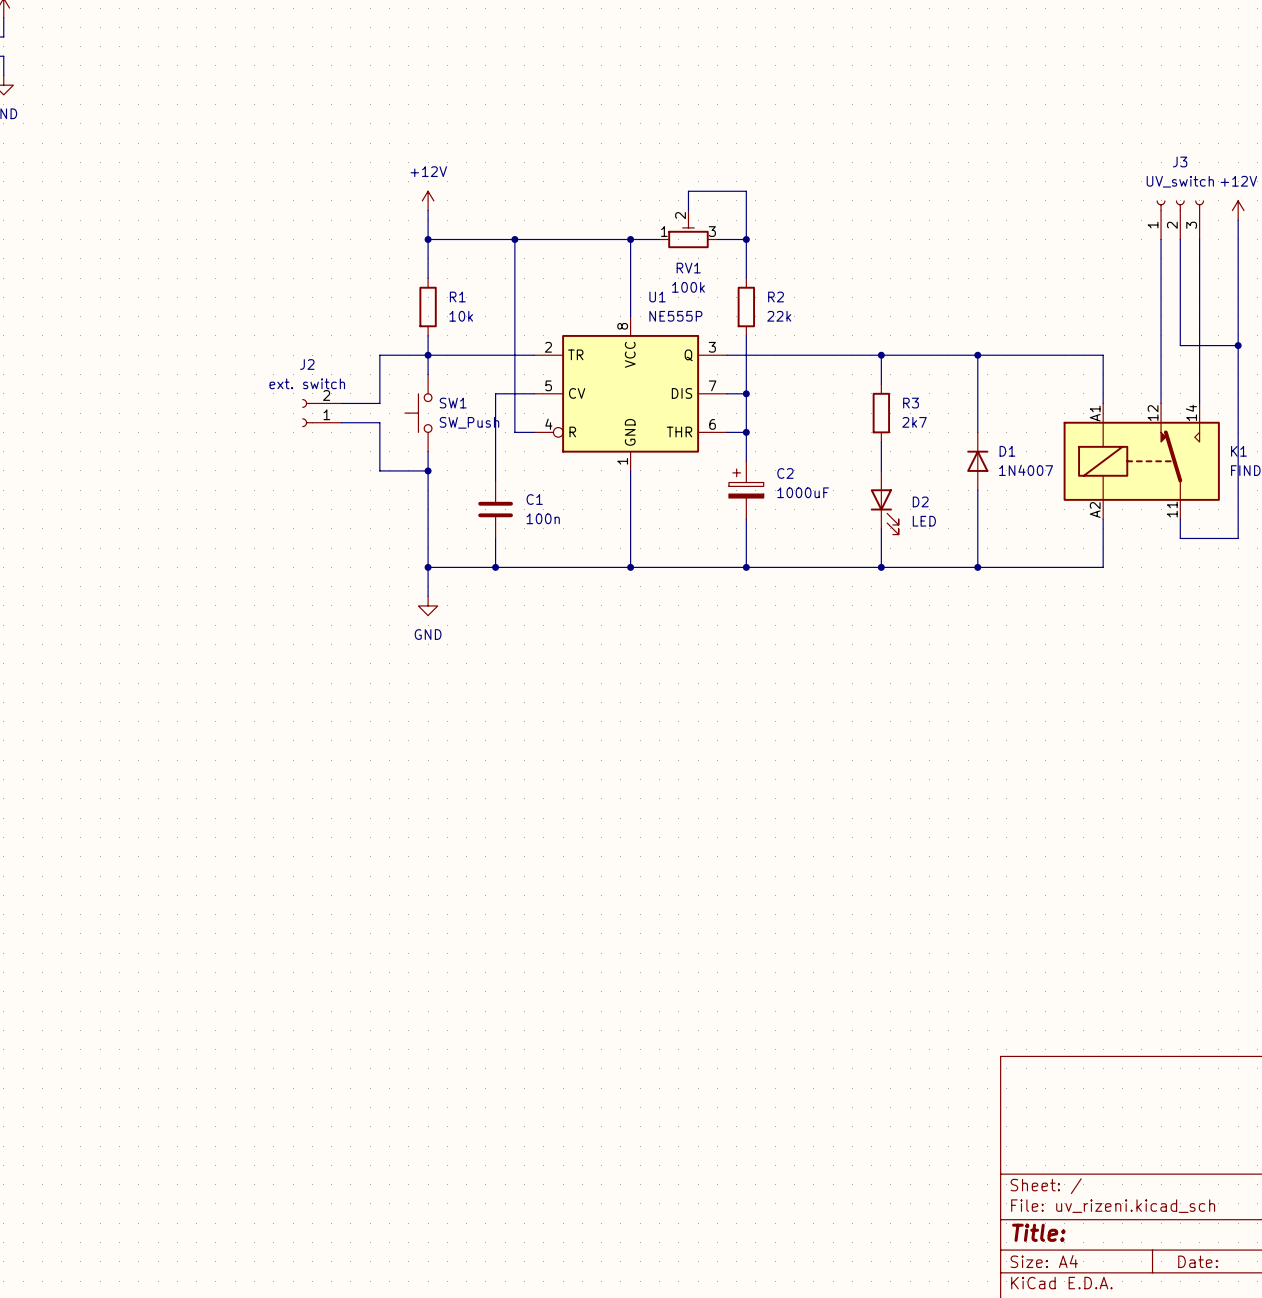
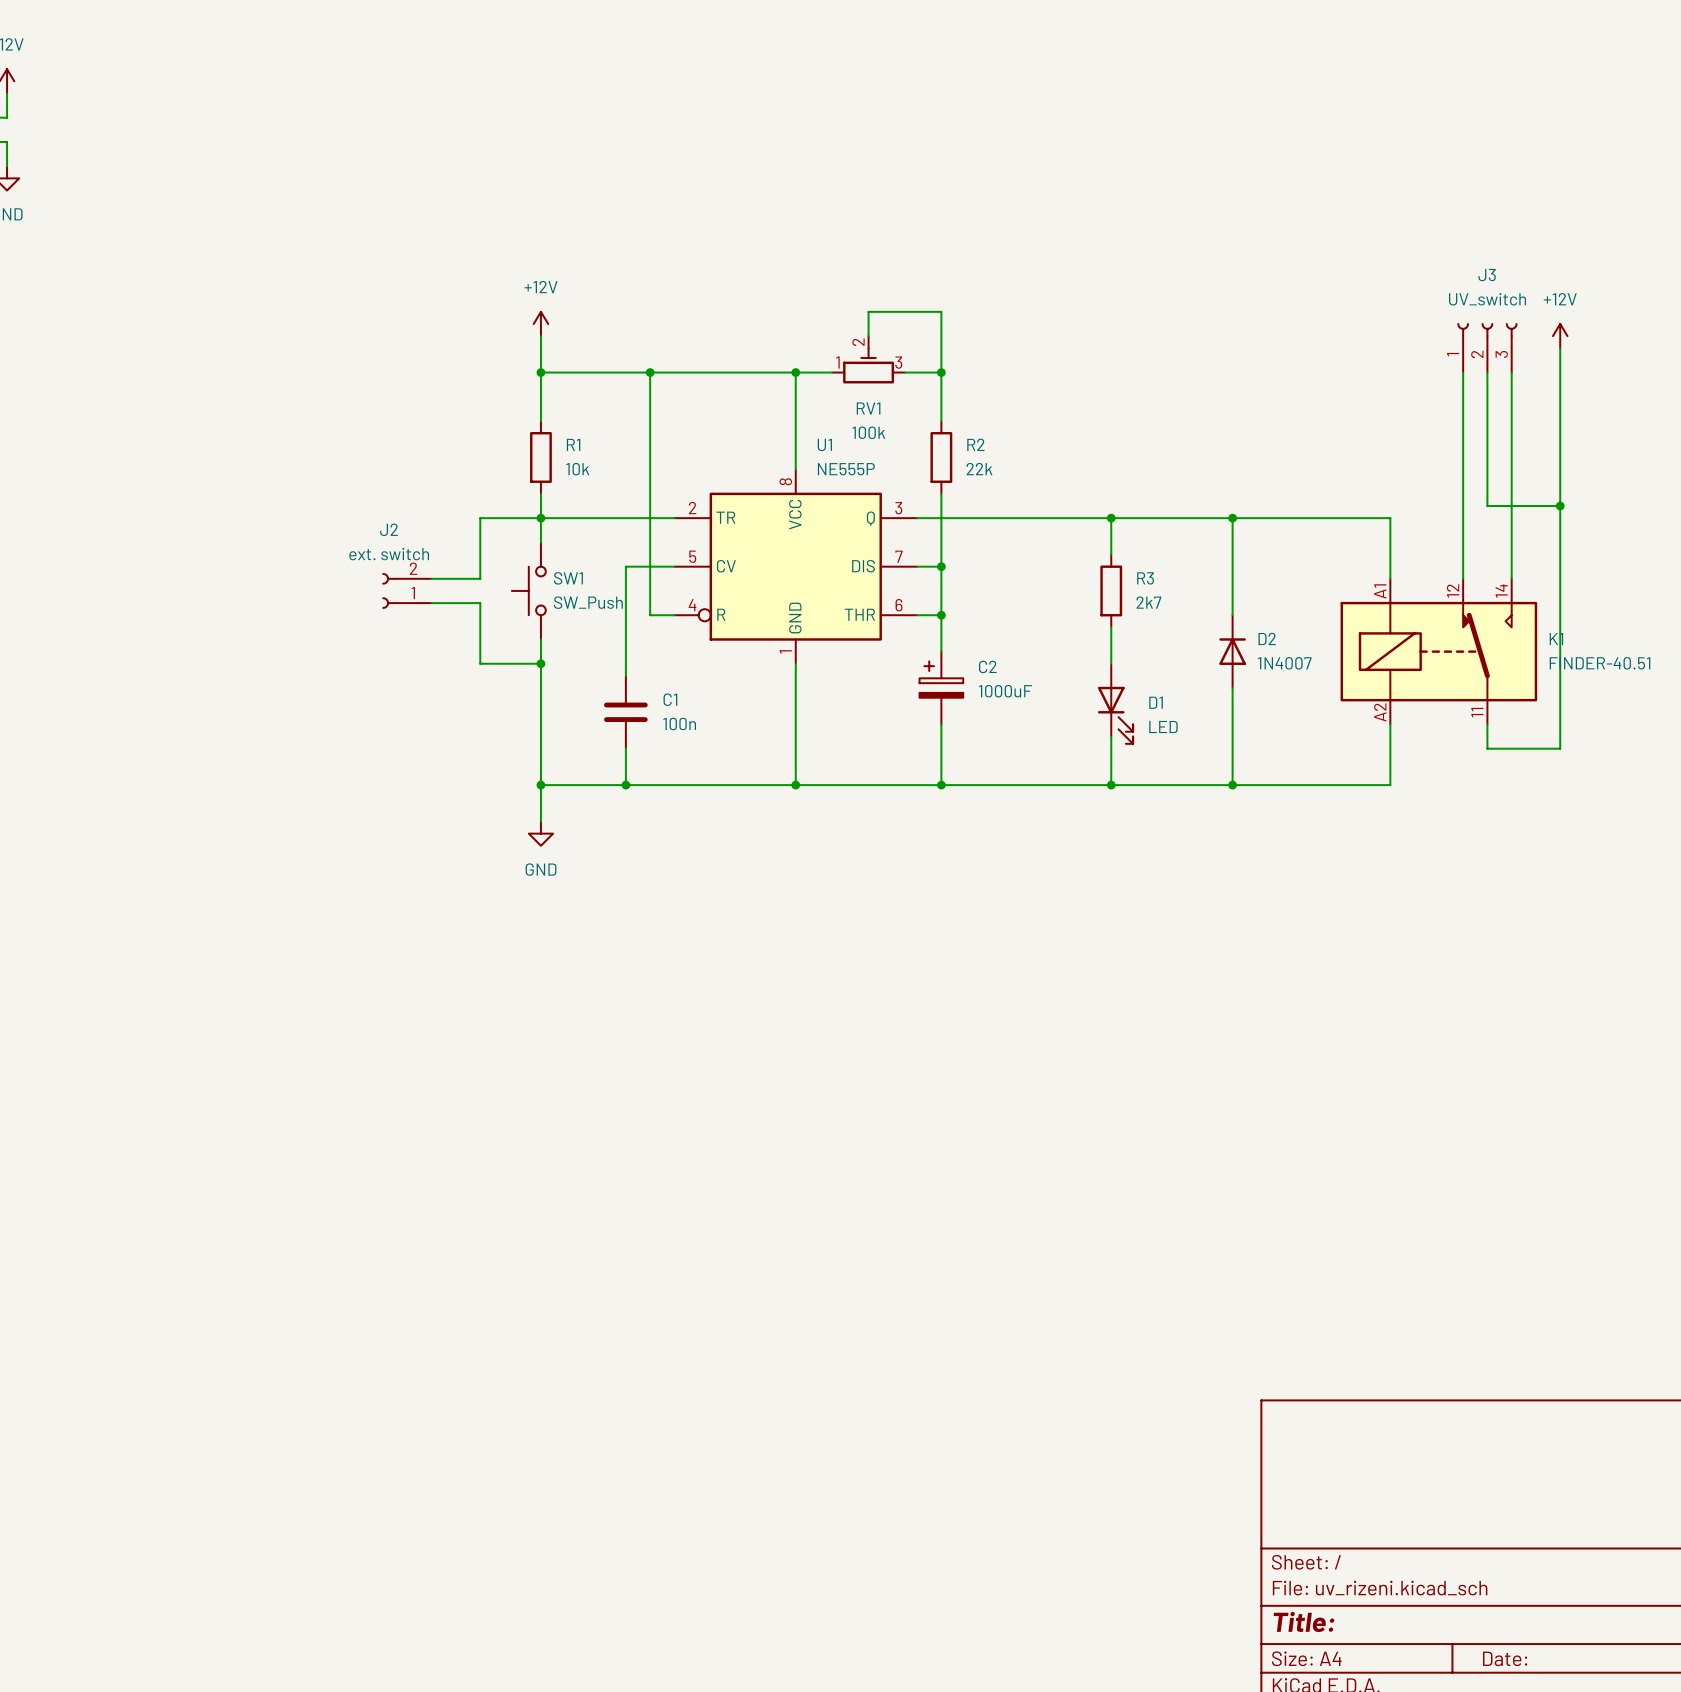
D1 name: D1 (1007, 451) -> D2 (1267, 638)
D2 name: D2 (920, 501) -> D1 (1156, 702)

